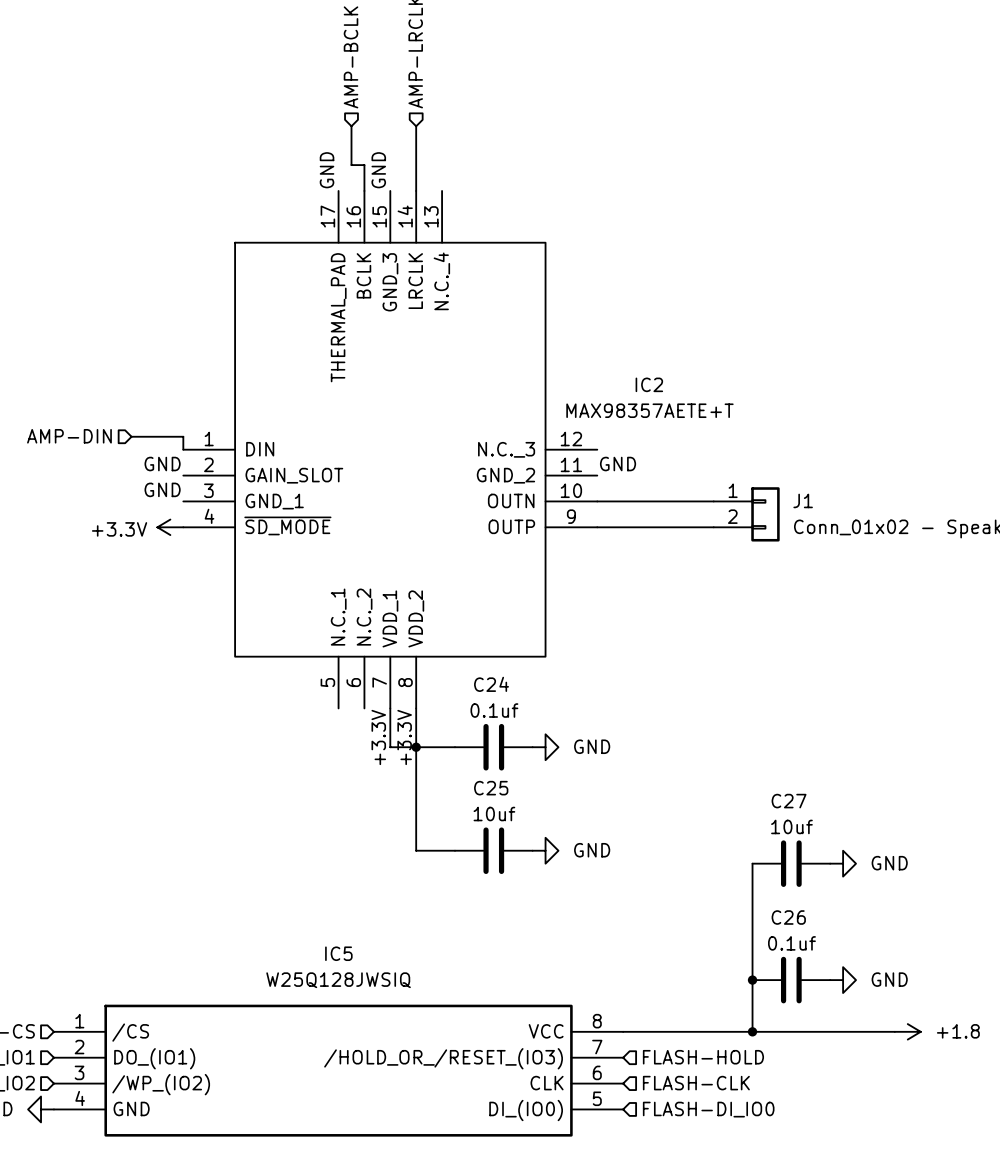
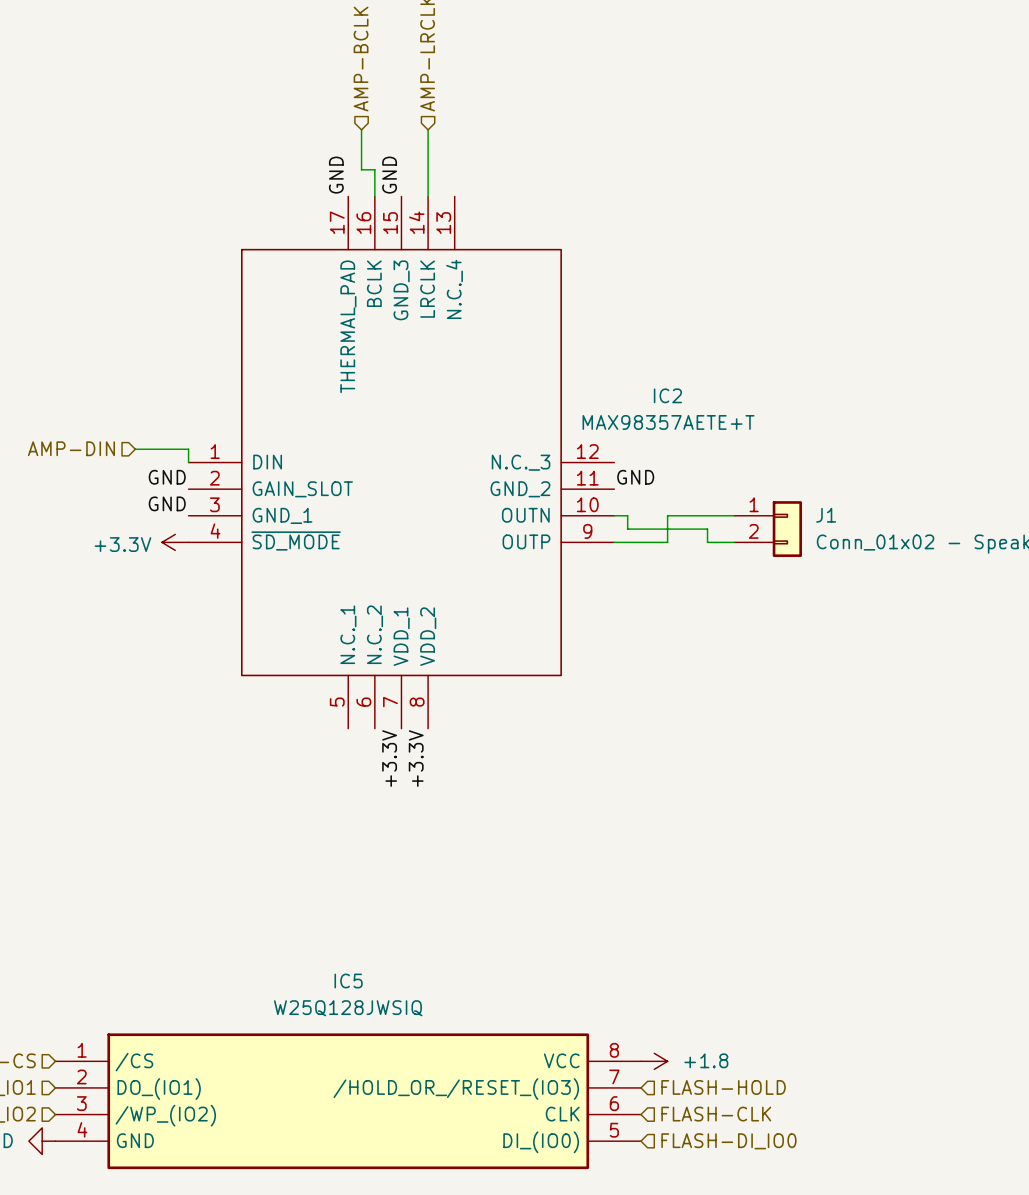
wire: (610, 501) (649, 501) -> (627, 515) (627, 529) (707, 529) (707, 542)
wire: (649, 527) (687, 527) -> (667, 542) (667, 515)
wire: (390, 708) (390, 747) (454, 747) -> none
wire: (416, 708) (416, 850) (454, 850) -> none
junction: (416, 747) -> none
C24: 0.1uf (493, 747) -> none
power symbol: GND (545, 747) -> none
C25: 10uf (493, 850) -> none
power symbol: GND (545, 850) -> none
wire: (752, 863) (752, 1031) -> none
C27: 10uf (791, 863) -> none
power symbol: GND (843, 863) -> none
junction: (752, 980) -> none
C26: 0.1uf (791, 980) -> none
power symbol: GND (843, 980) -> none
wire: (623, 1031) (894, 1031) -> none
power symbol: none -> +1.8 (654, 1061)
junction: (752, 1031) -> none
power symbol: +1.8 (907, 1031) -> none

